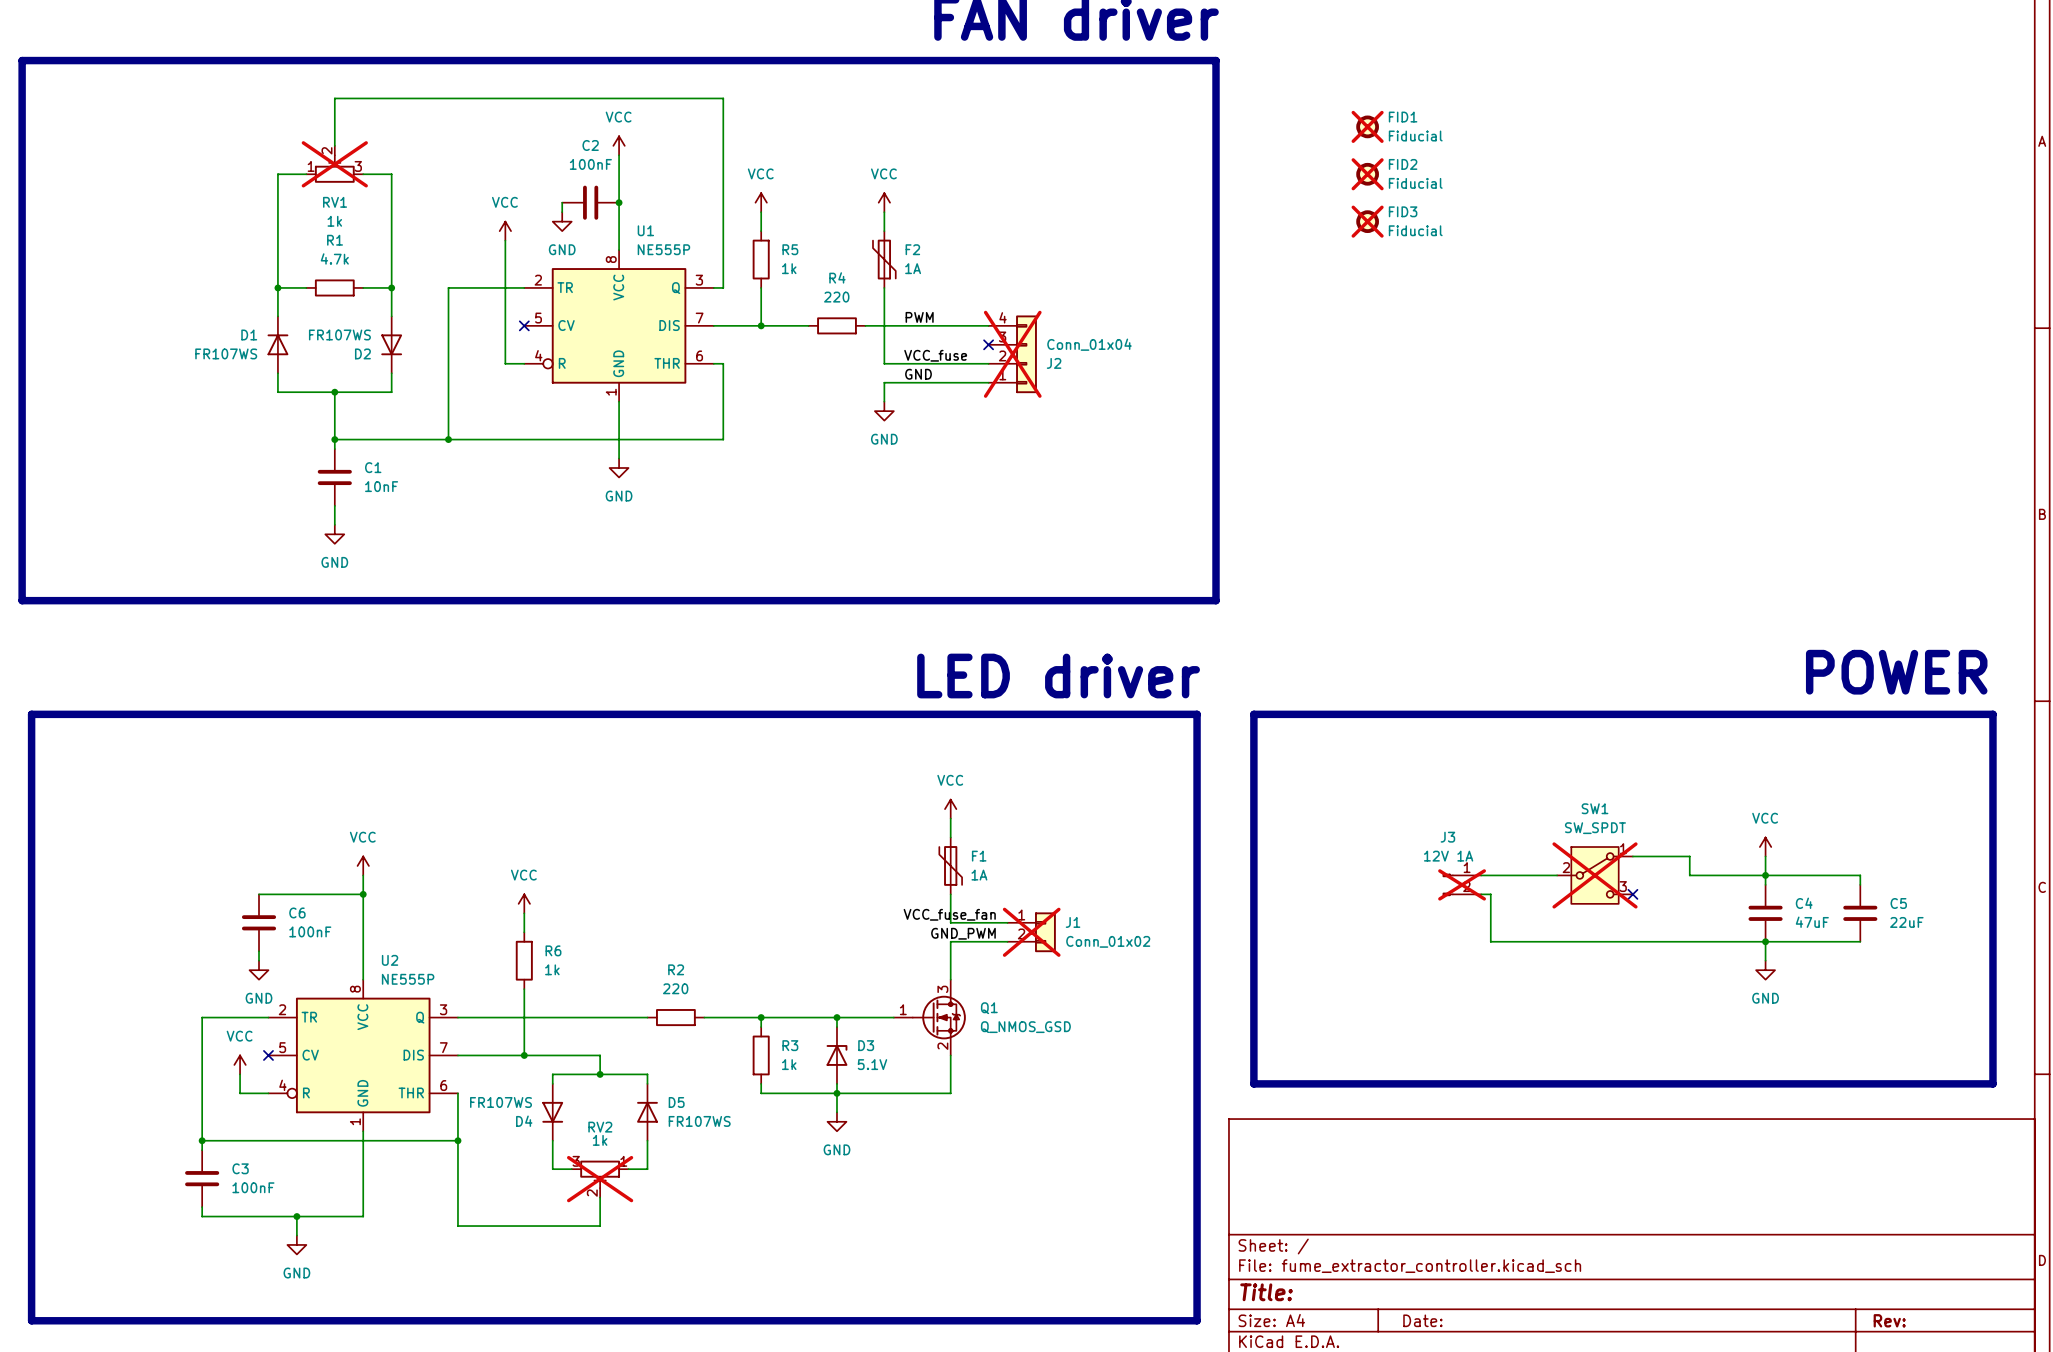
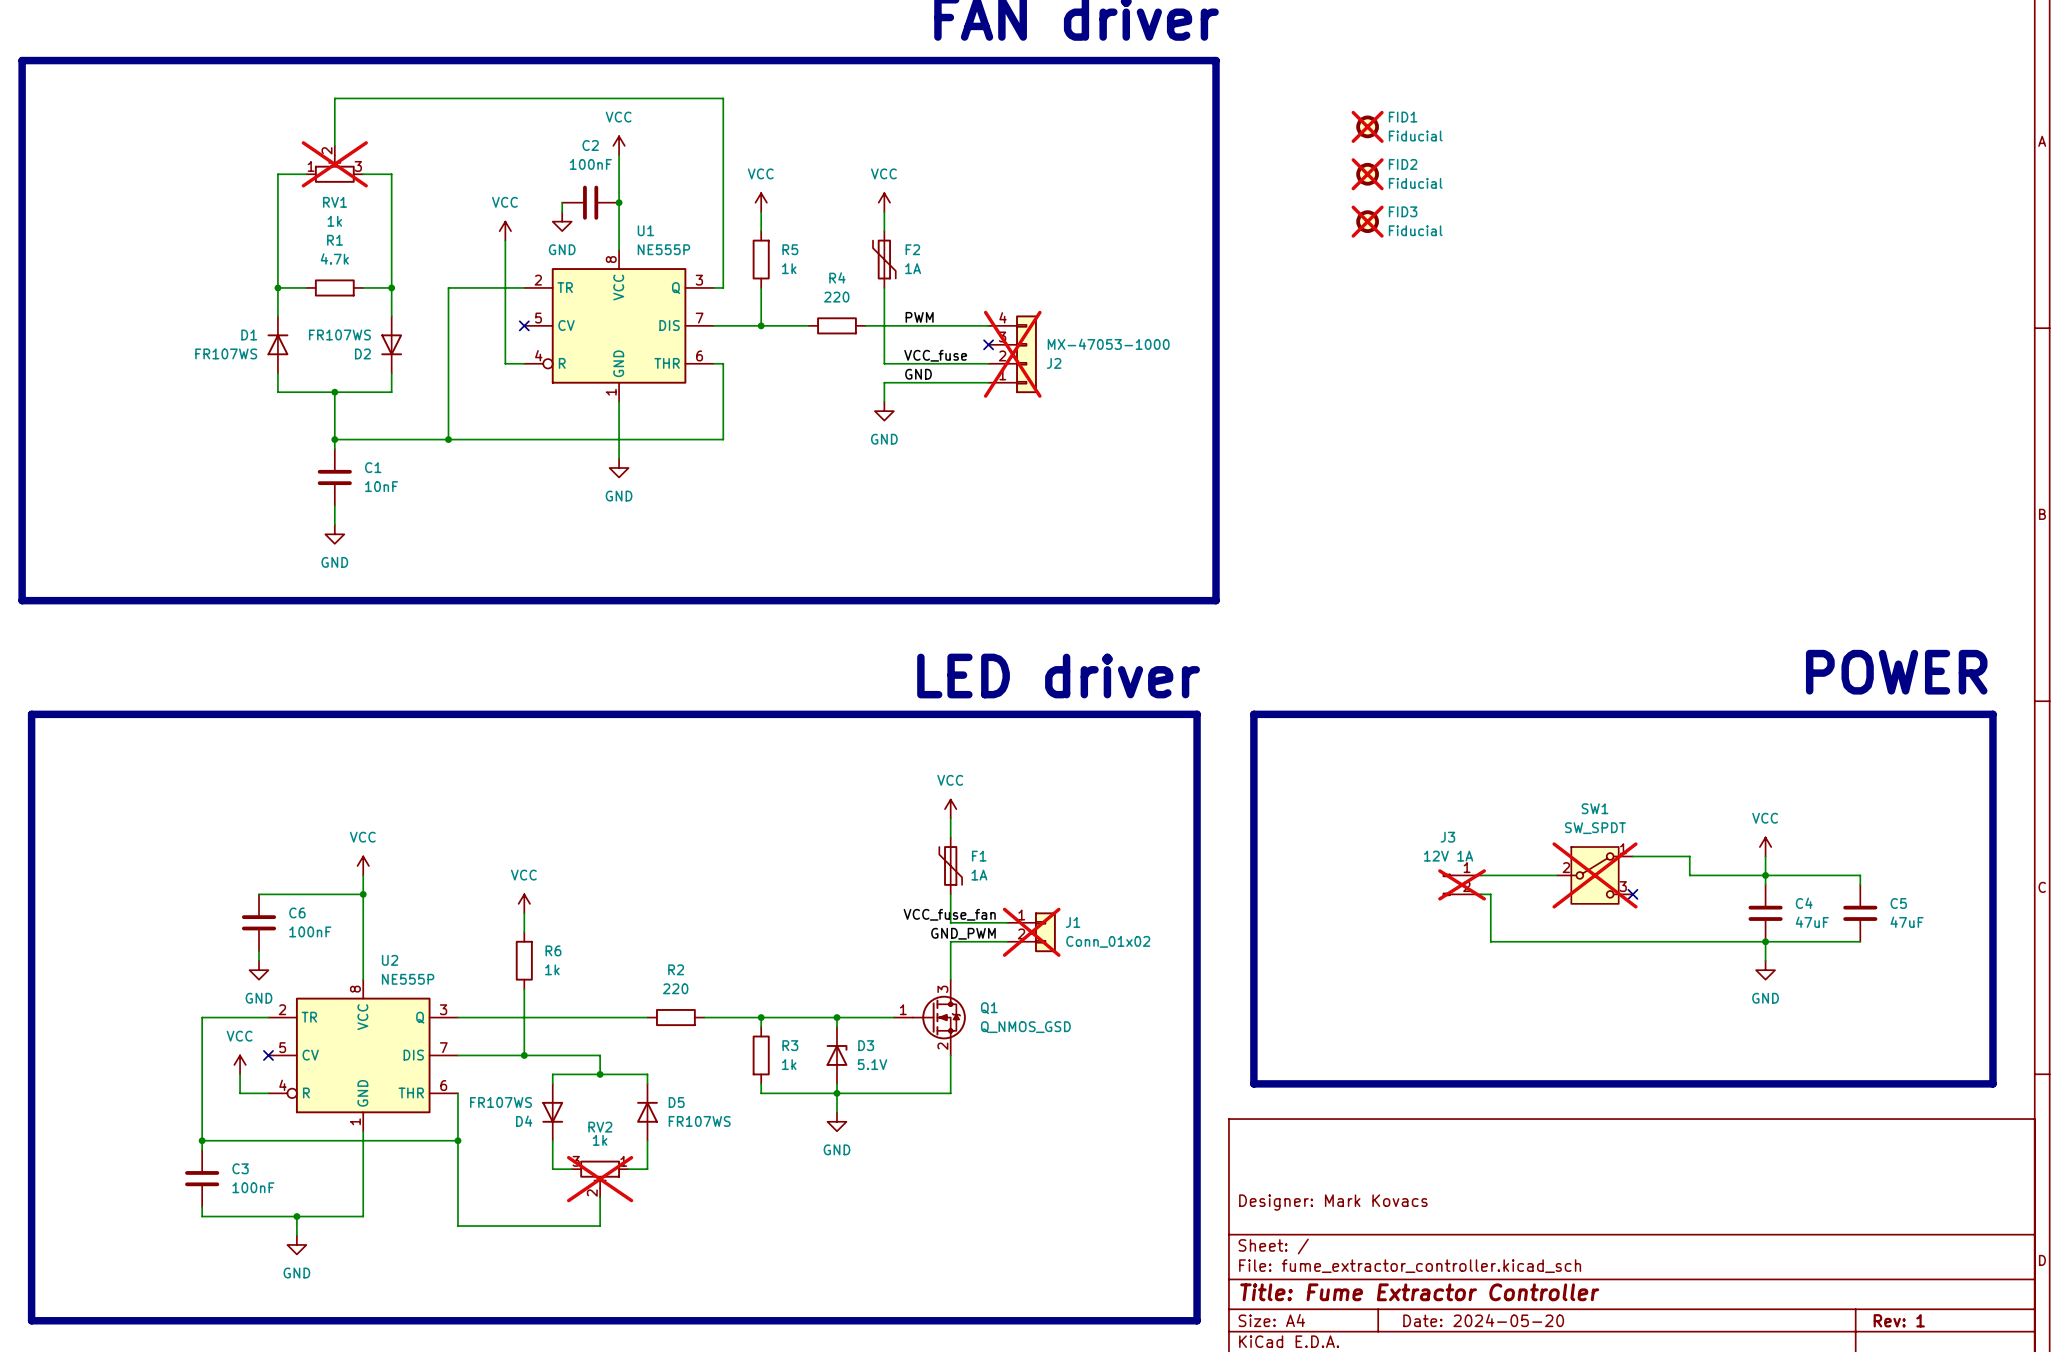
J2 value: Conn_01x04 (1089, 344) -> MX-47053-1000 (1108, 344)
C5 value: 22uF (1906, 922) -> 47uF (1907, 922)
title block: none -> Designer: Mark Kovacs (1333, 1202)
title block: Title: (1266, 1292) -> Title: Fume Extractor Controller (1419, 1292)
title block: Date: (1422, 1320) -> Date: 2024-05-20 (1483, 1320)
title block: Rev: (1889, 1320) -> Rev: 1 (1899, 1320)

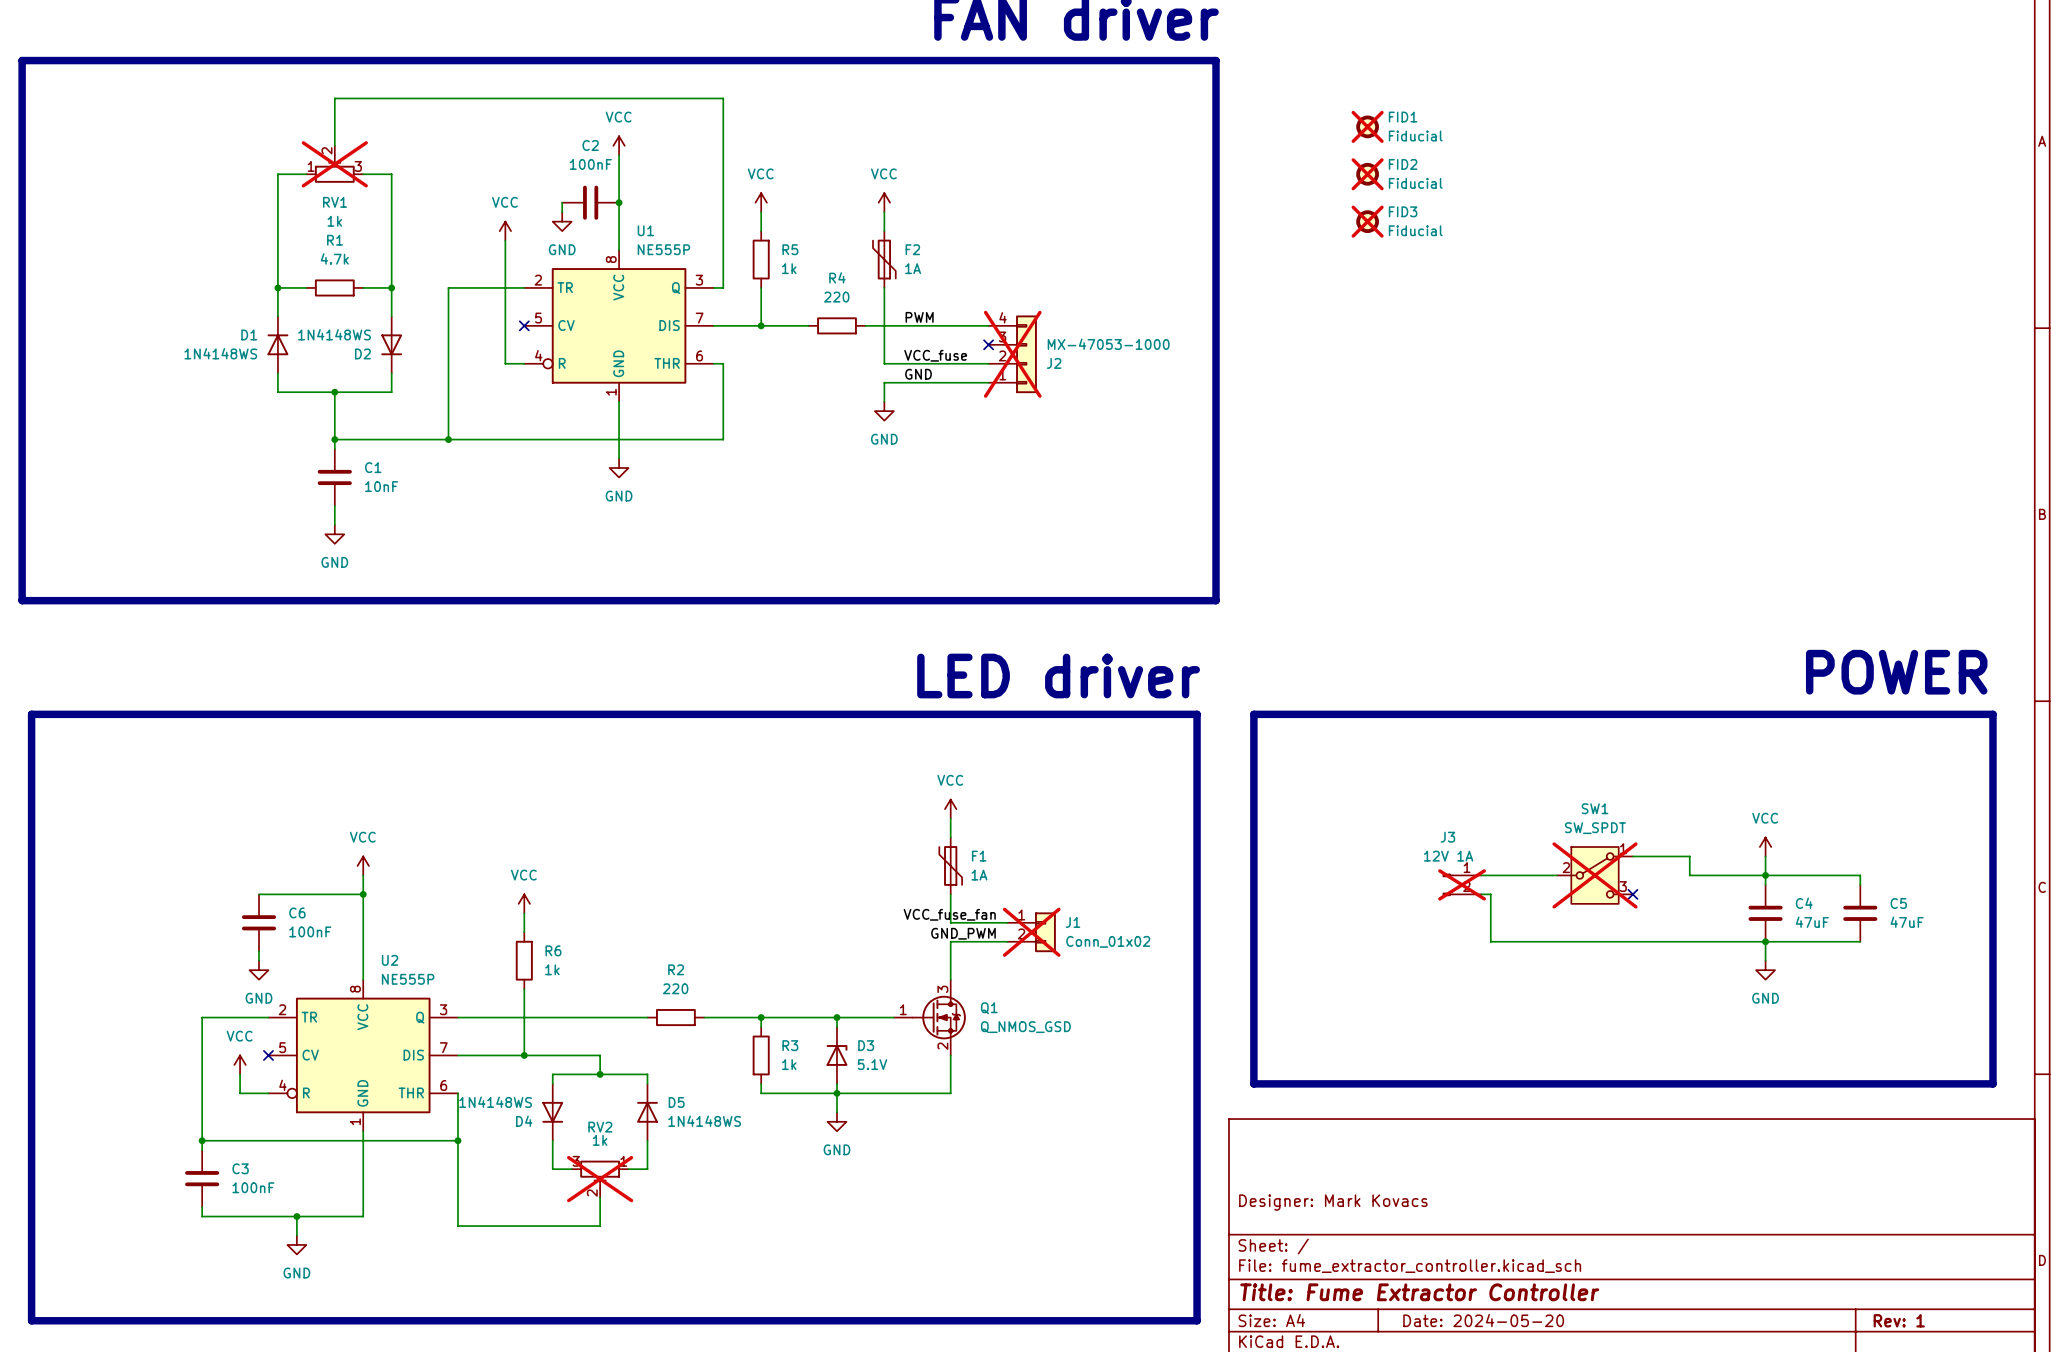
D2 value: FR107WS (339, 334) -> 1N4148WS (334, 334)
D1 value: FR107WS (226, 353) -> 1N4148WS (220, 353)
D4 value: FR107WS (501, 1102) -> 1N4148WS (495, 1102)
D5 value: FR107WS (699, 1121) -> 1N4148WS (704, 1121)

